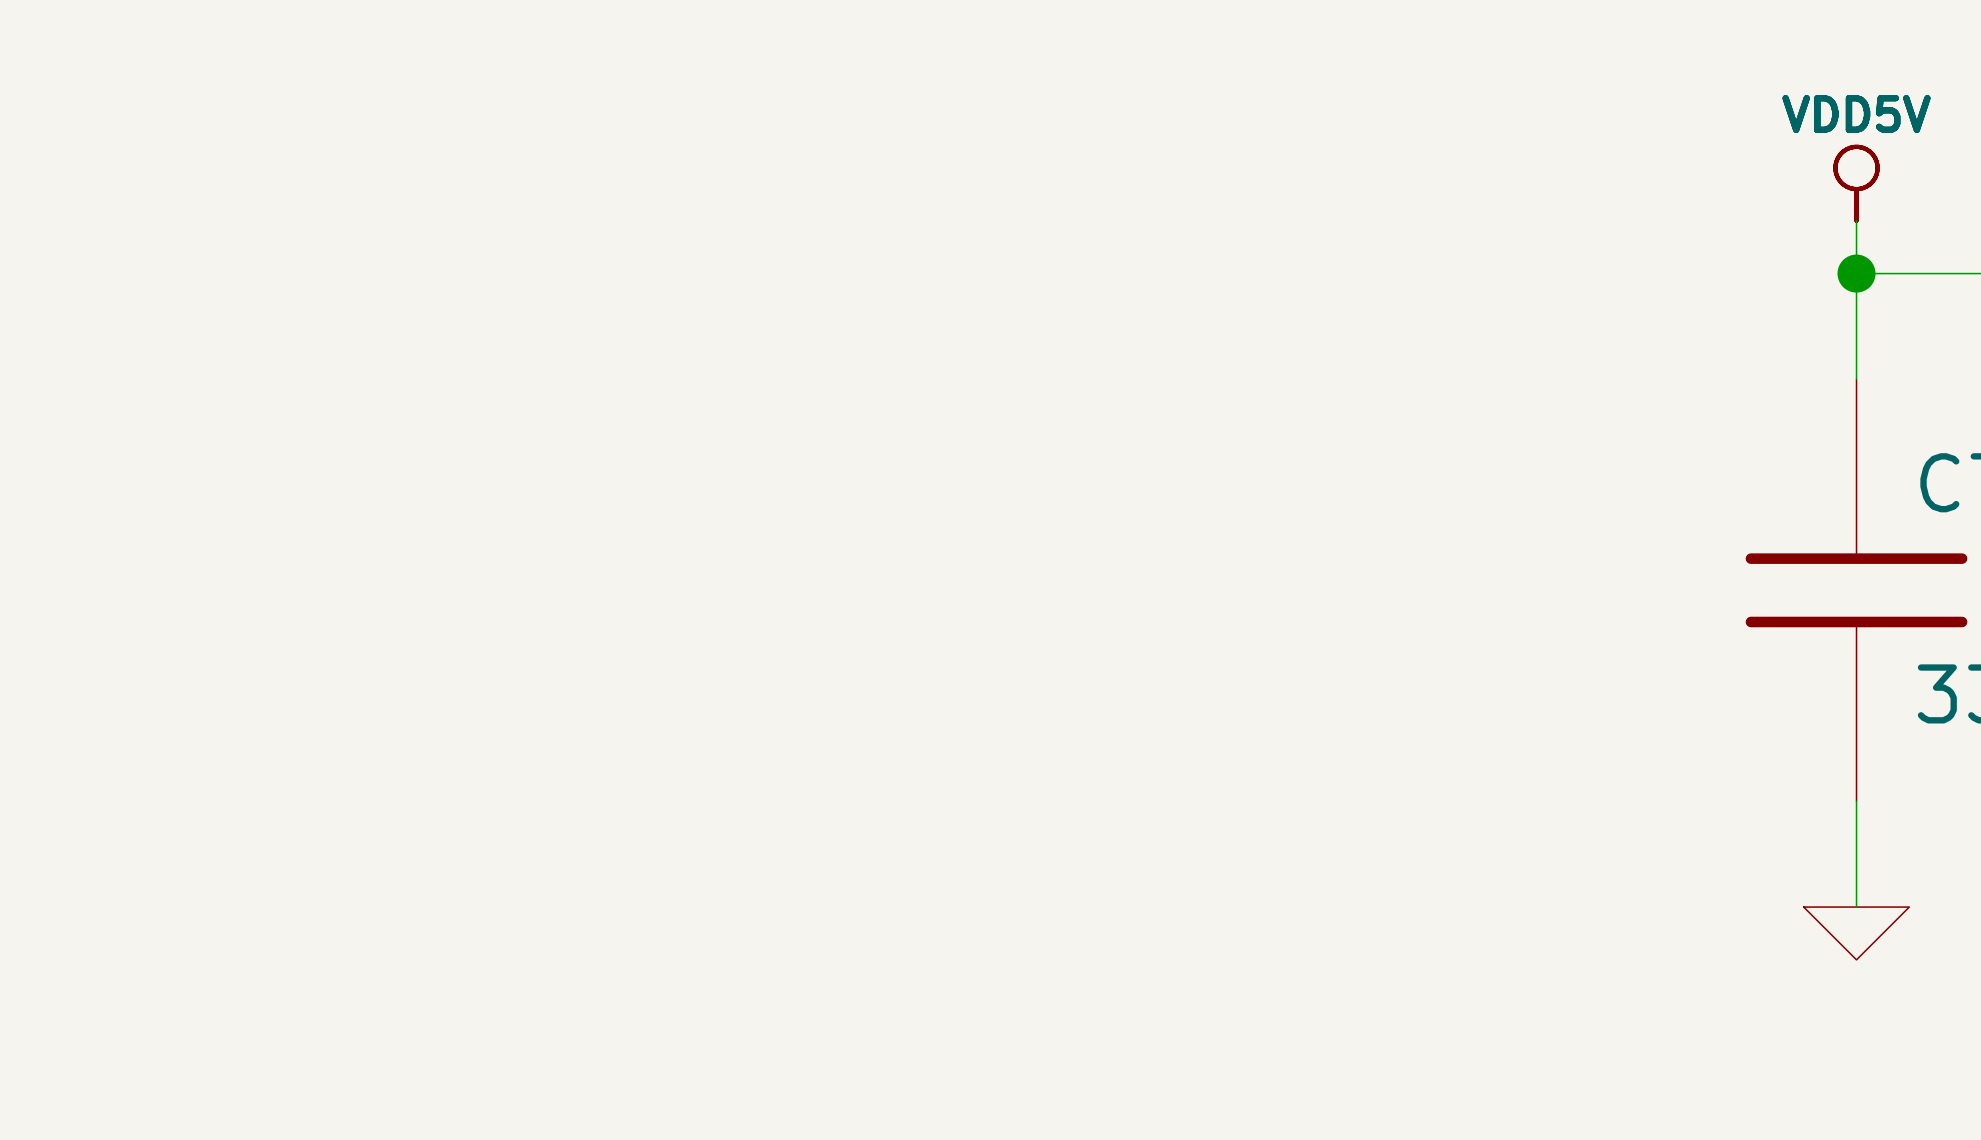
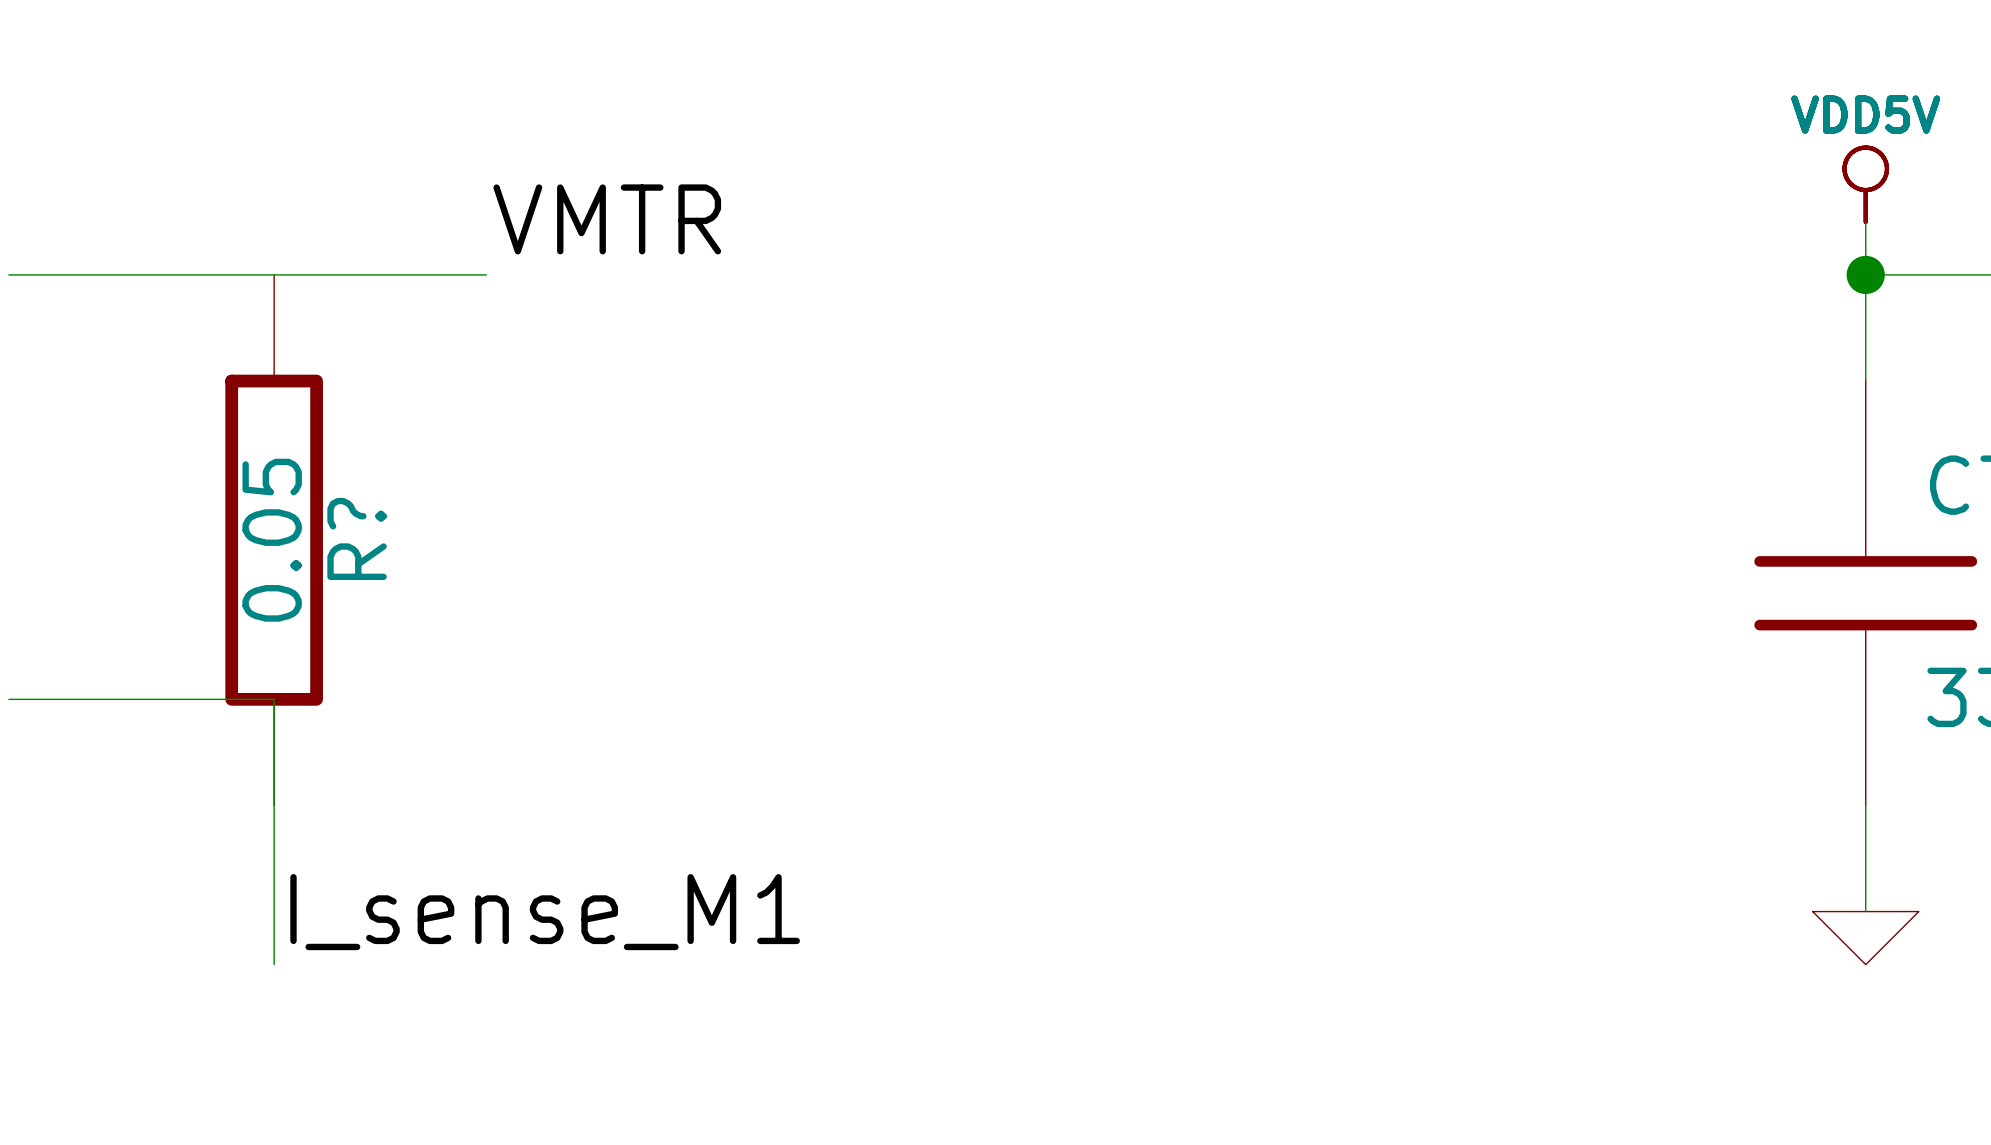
label: none -> VMTR (607, 219)
wire: none -> (8, 274) (486, 274)
R?: none -> 0.05 (274, 540)
wire: none -> (8, 699) (274, 699) (274, 964)
label: none -> I_sense_M1 (545, 912)

